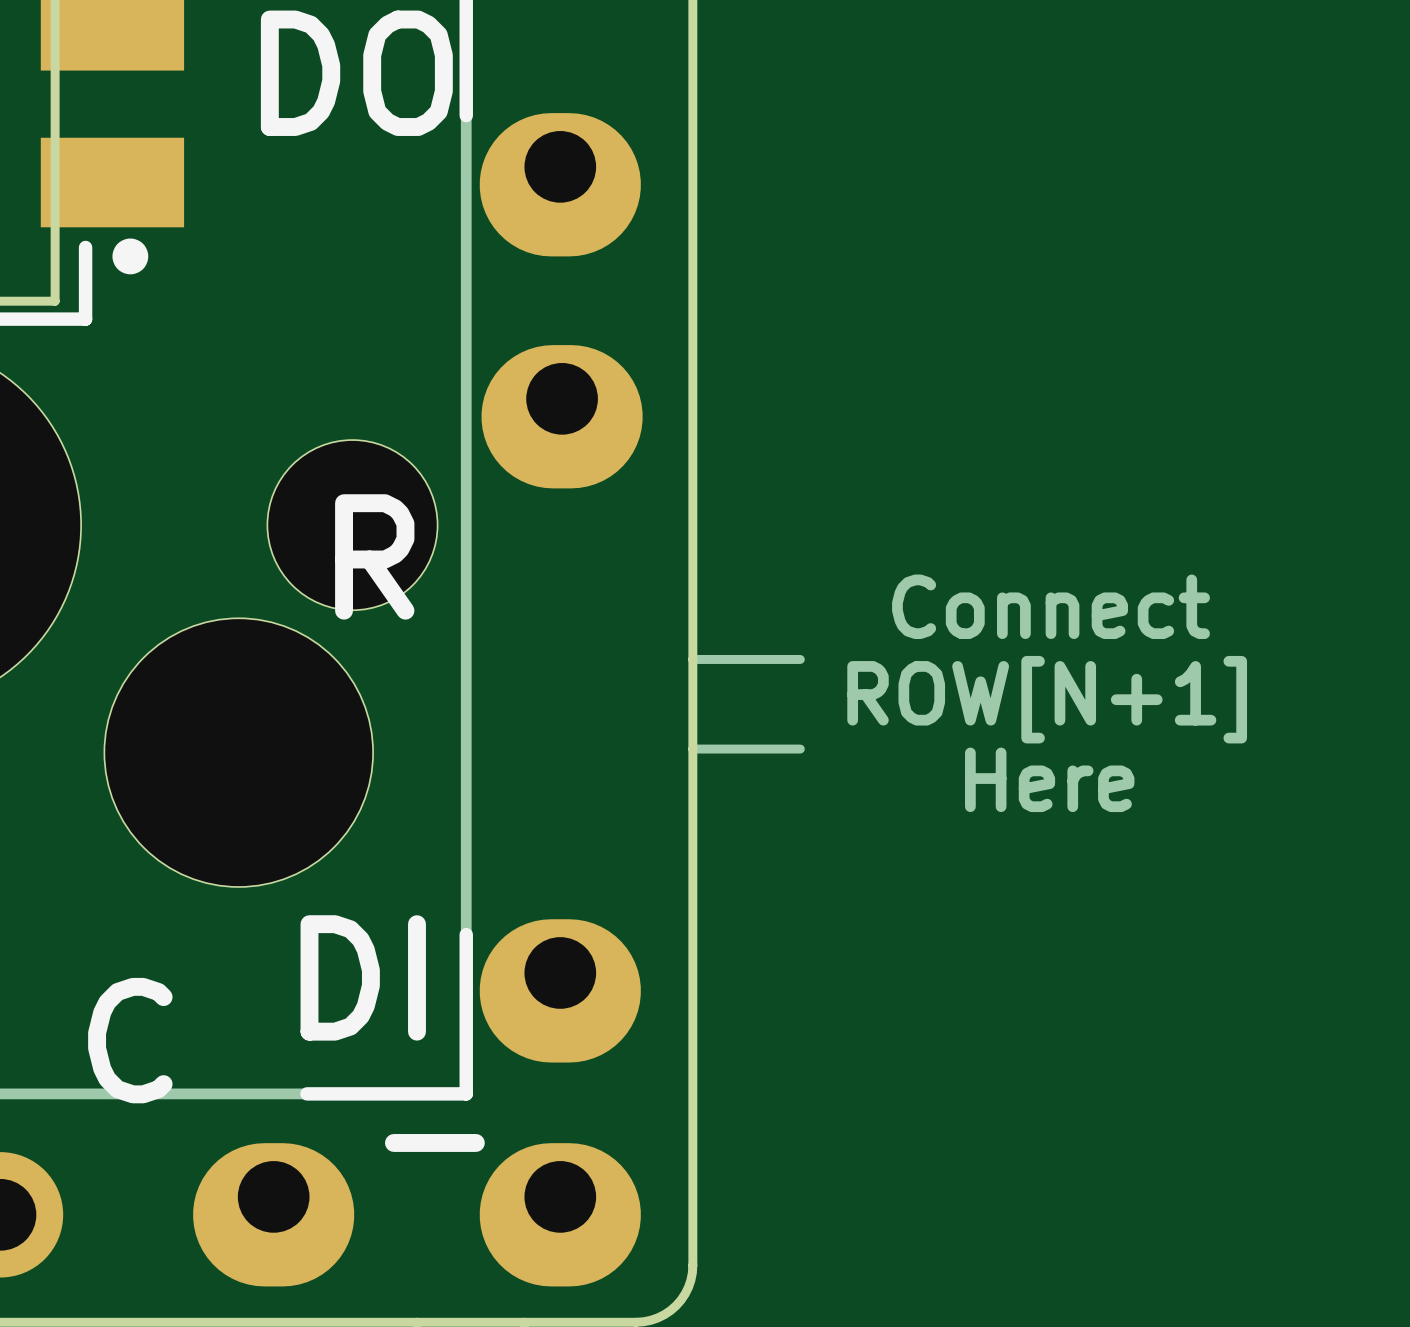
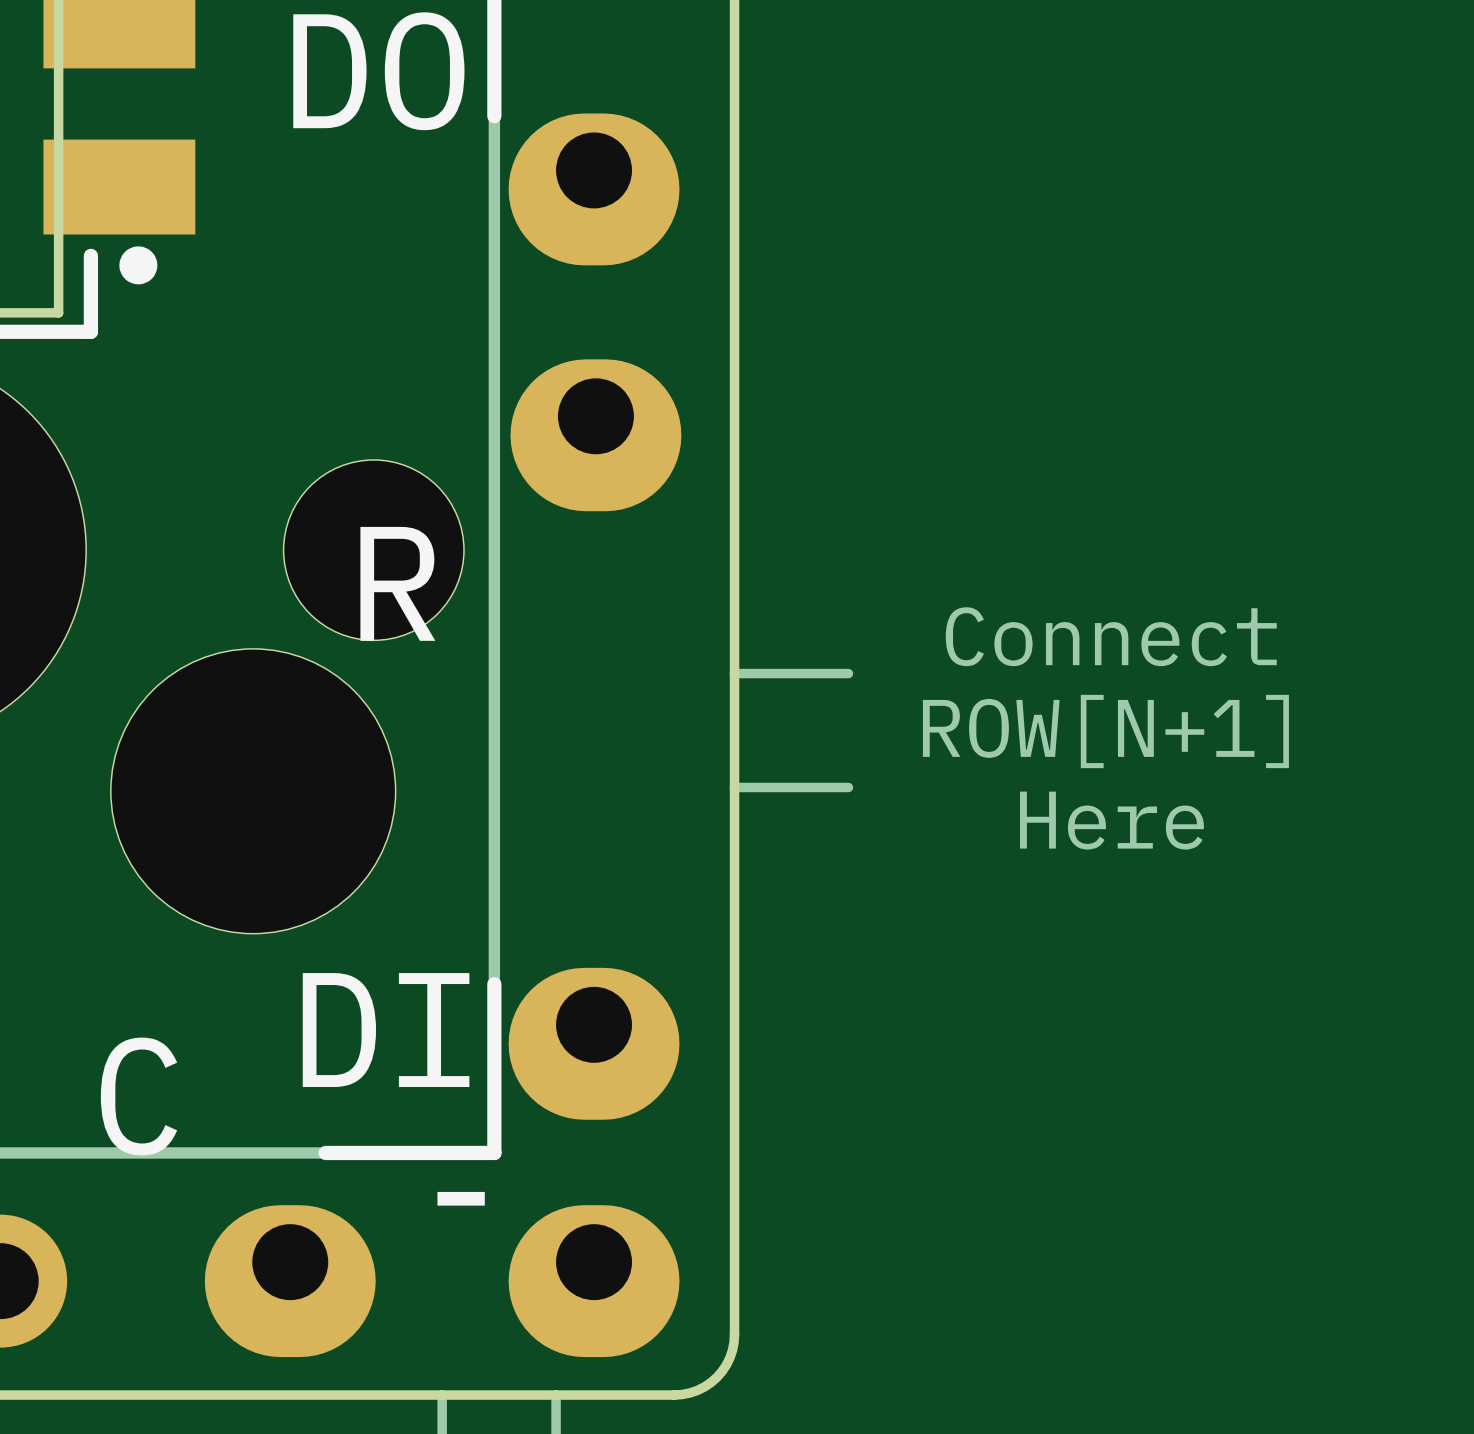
line: (692, 659) (800, 659) -> (734, 673) (848, 673)

